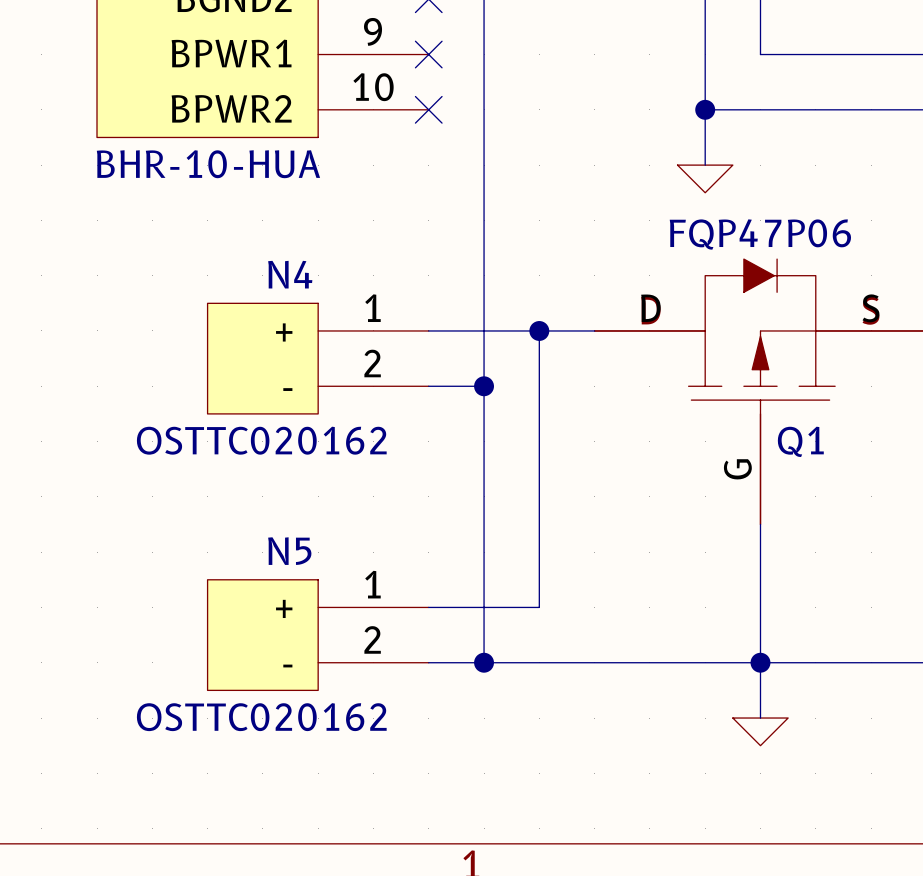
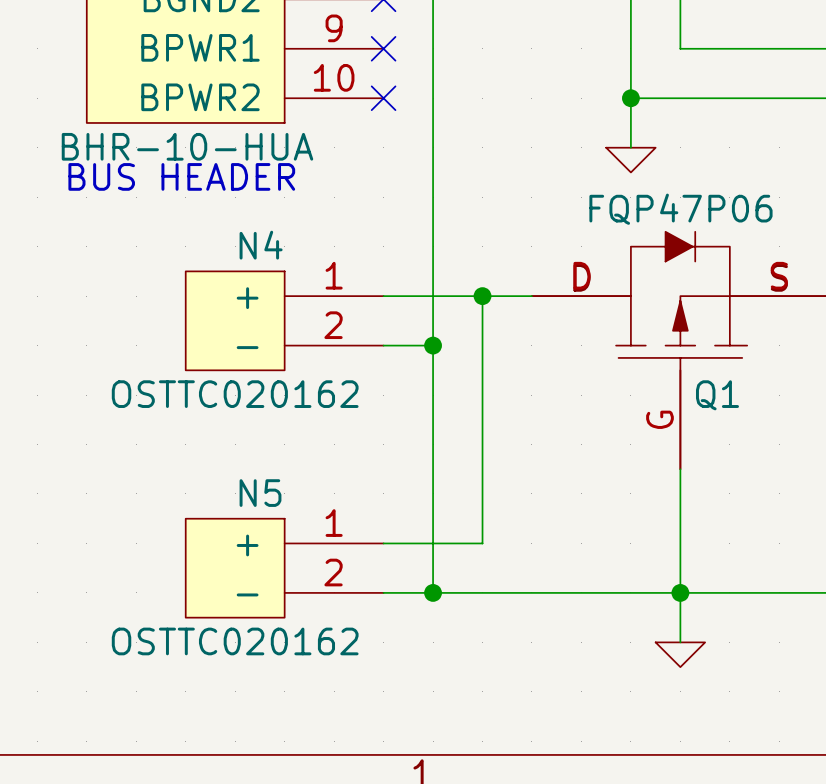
text: none -> BUS HEADER (181, 176)

